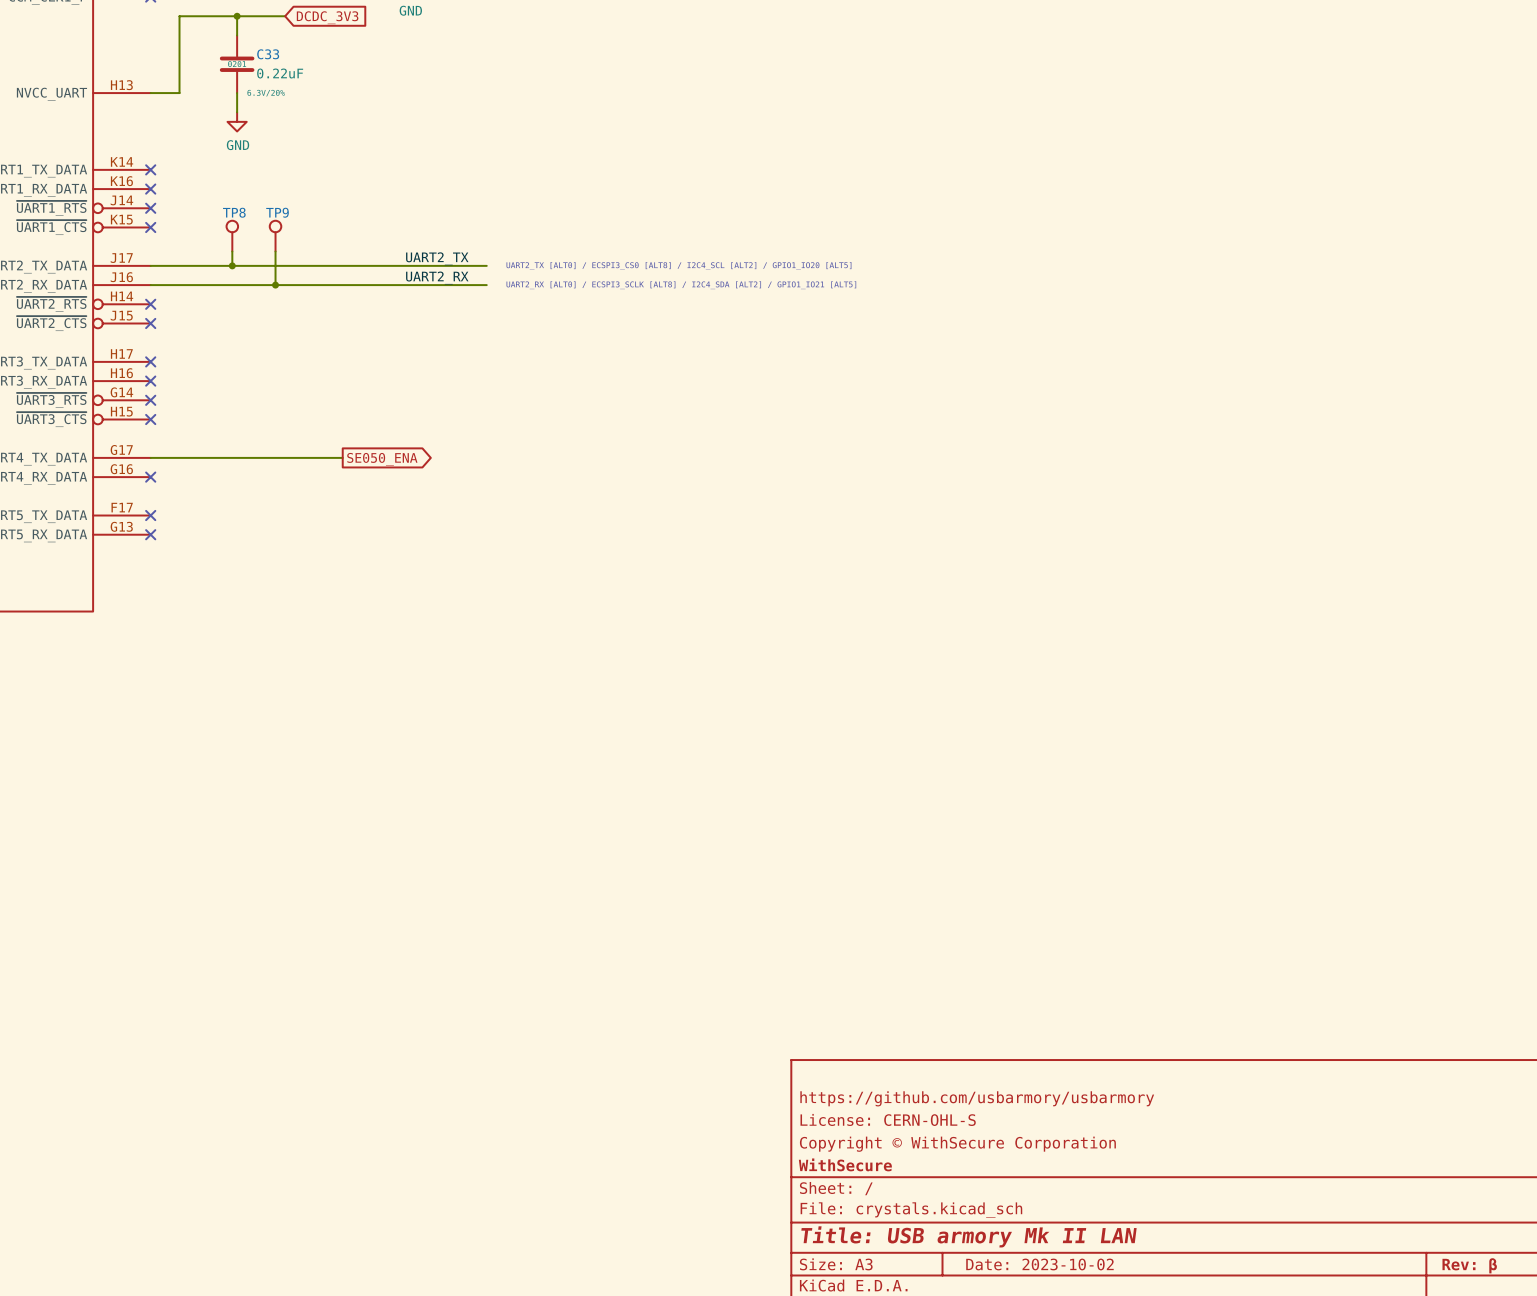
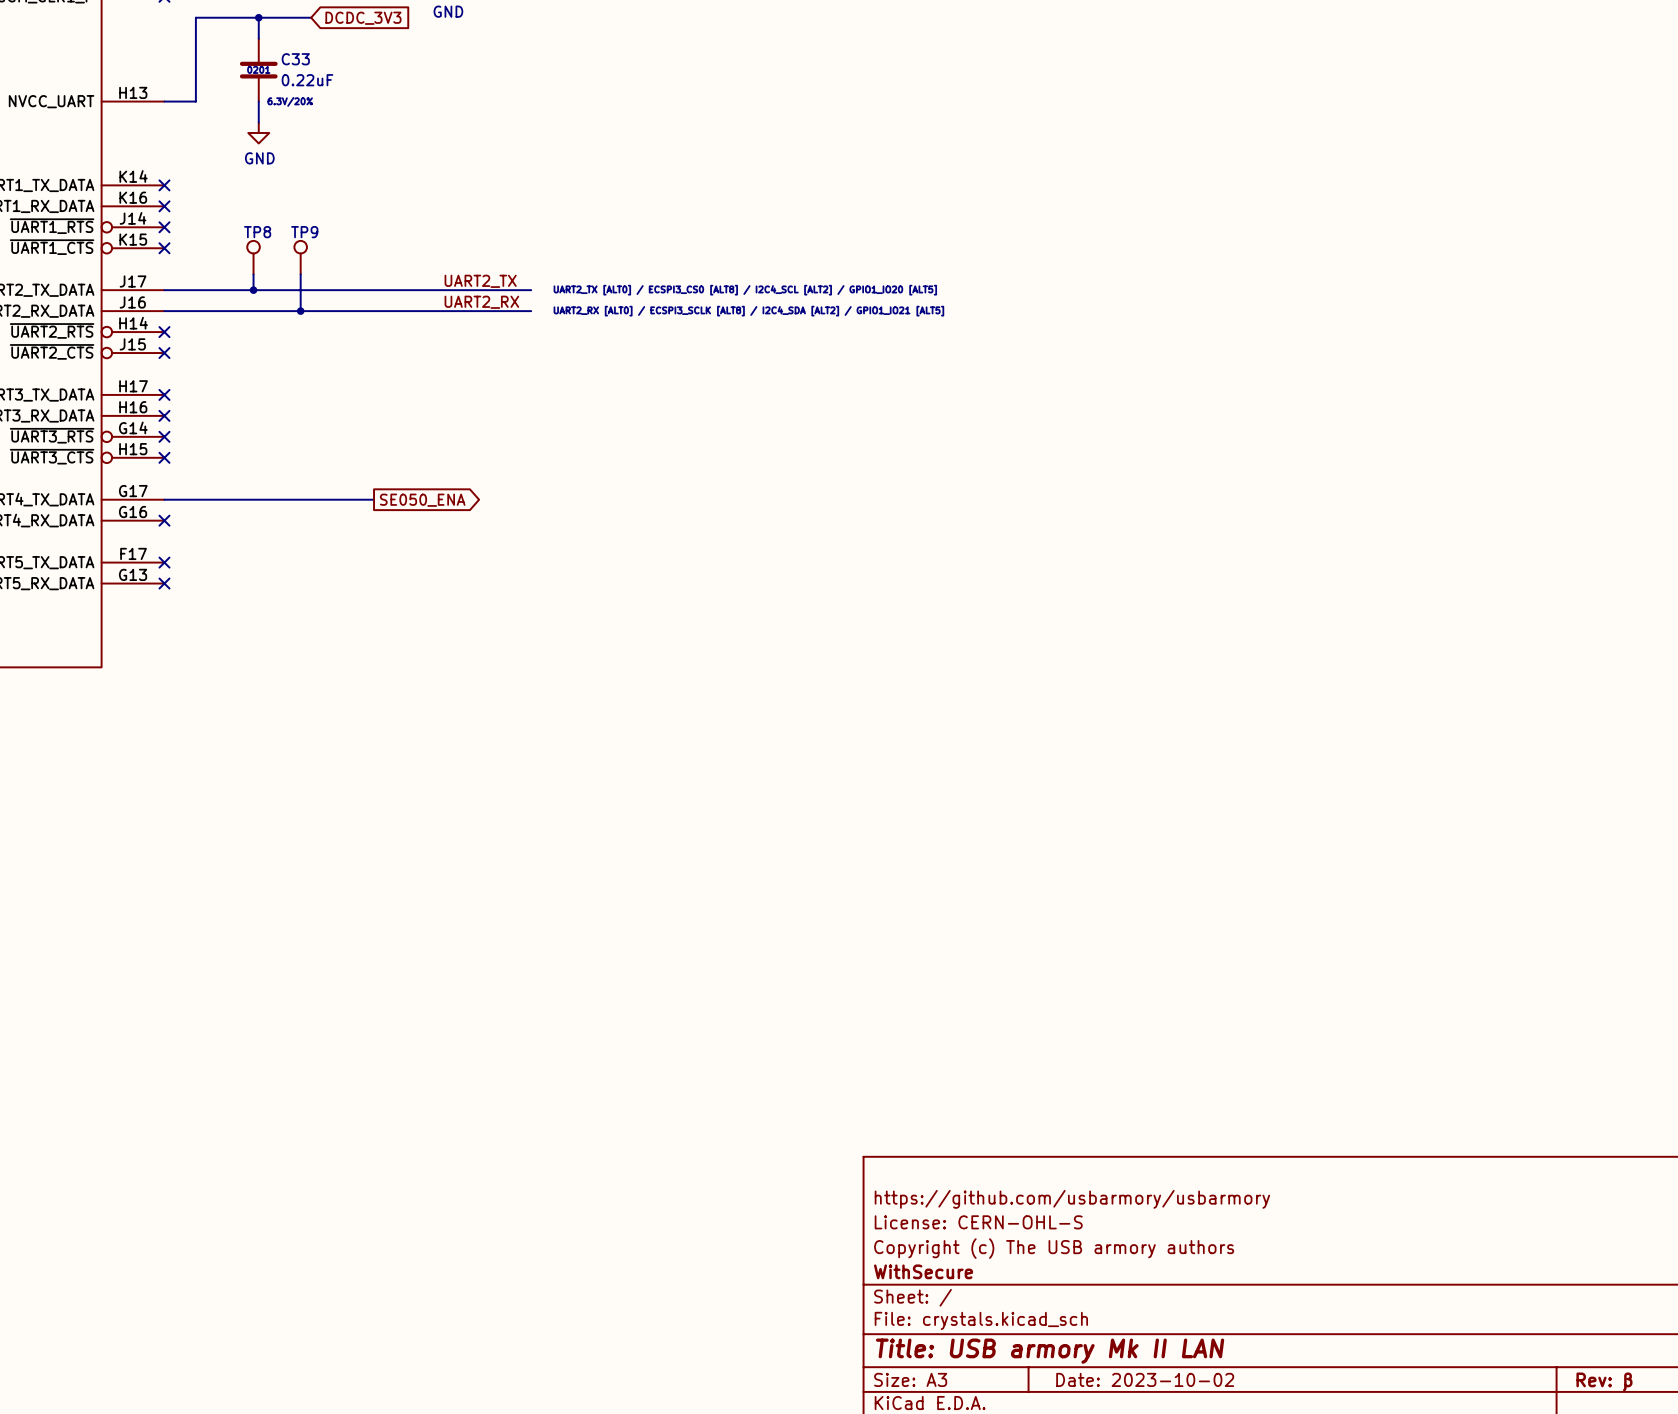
title block: Copyright © WithSecure Corporation (957, 1144) -> Copyright (c) The USB armory authors (1054, 1248)

